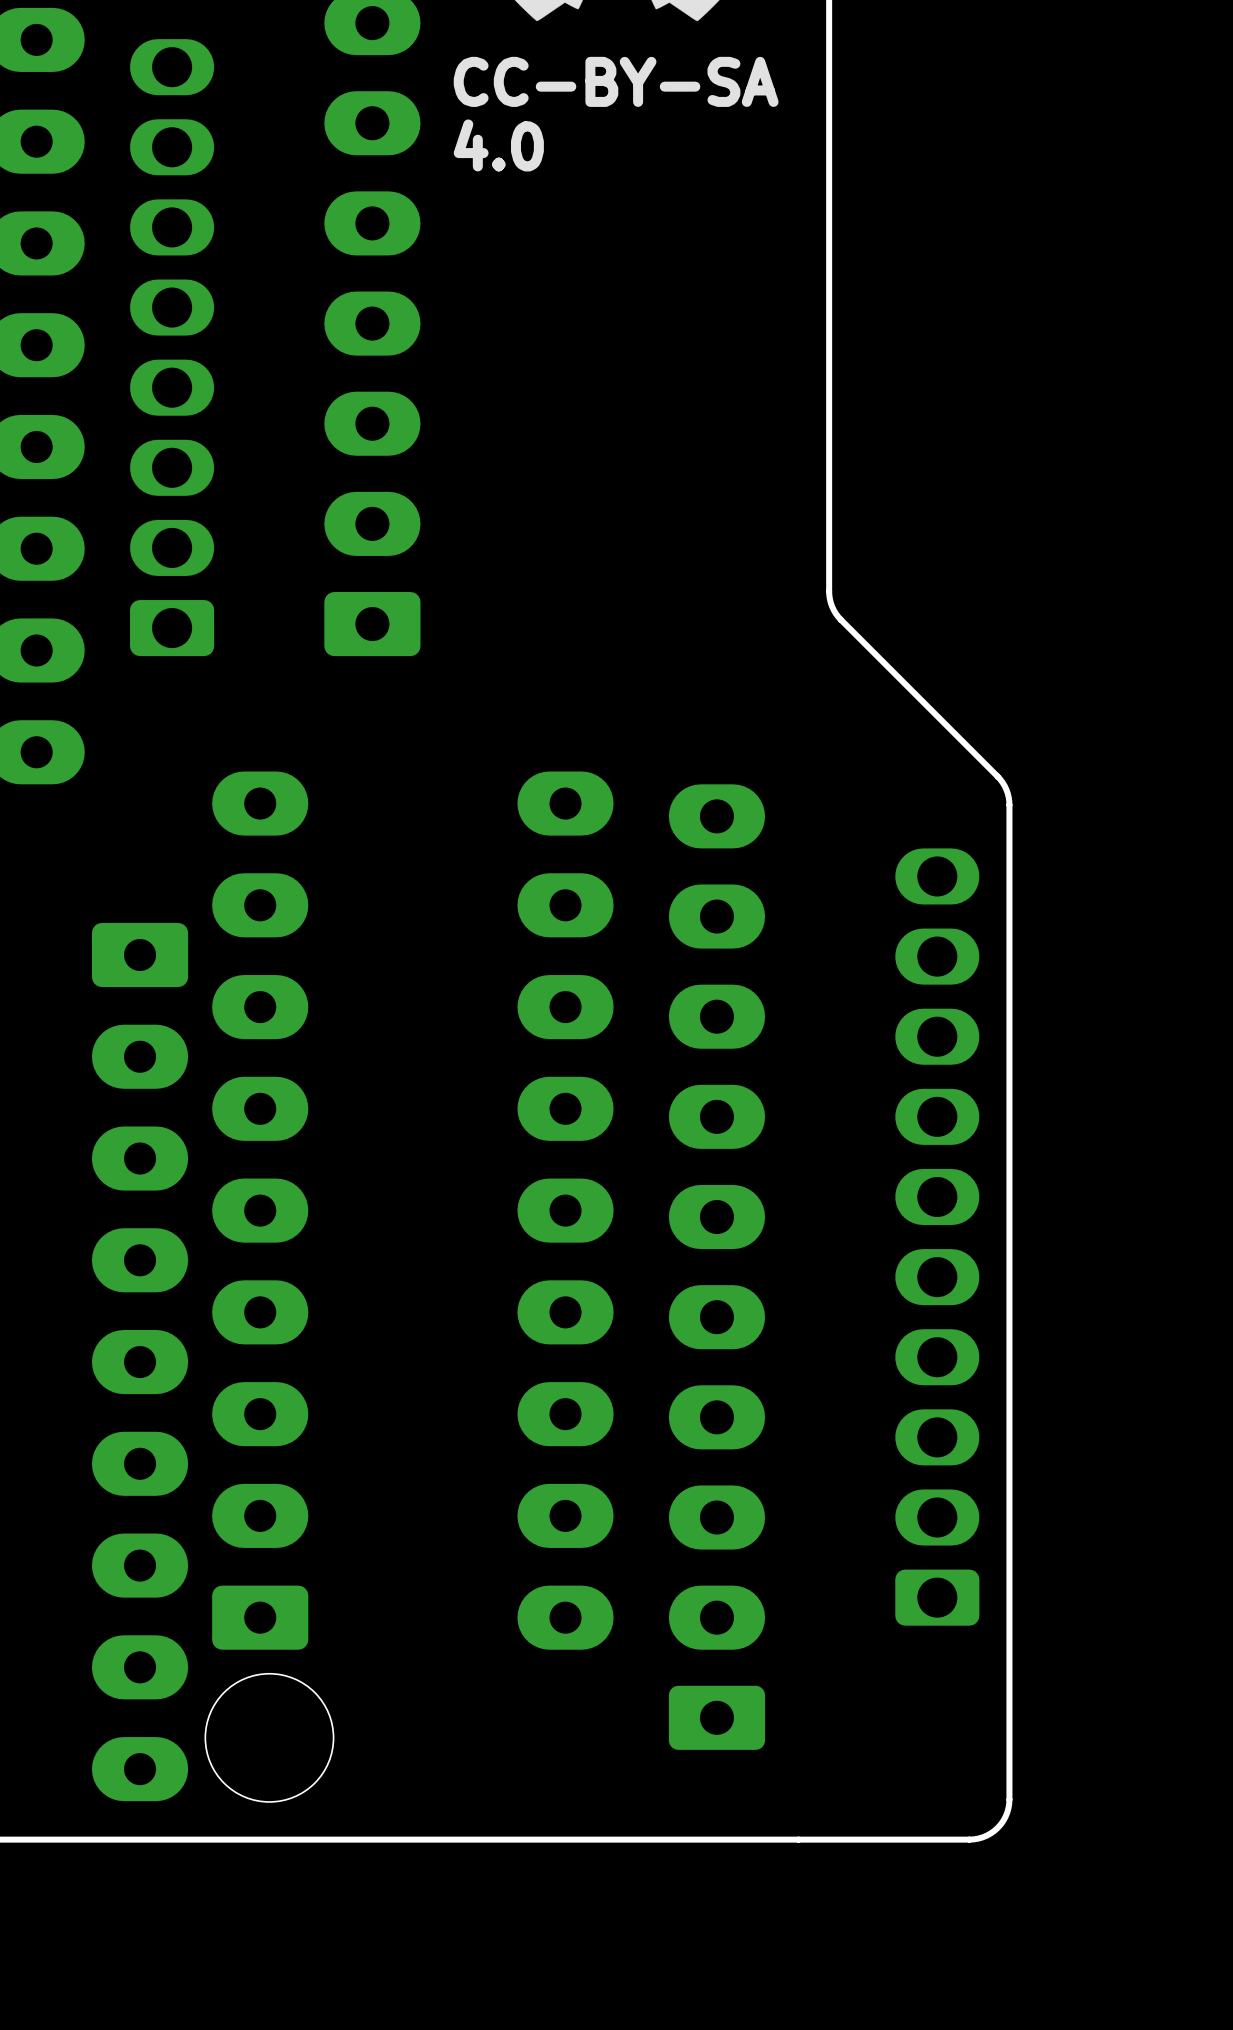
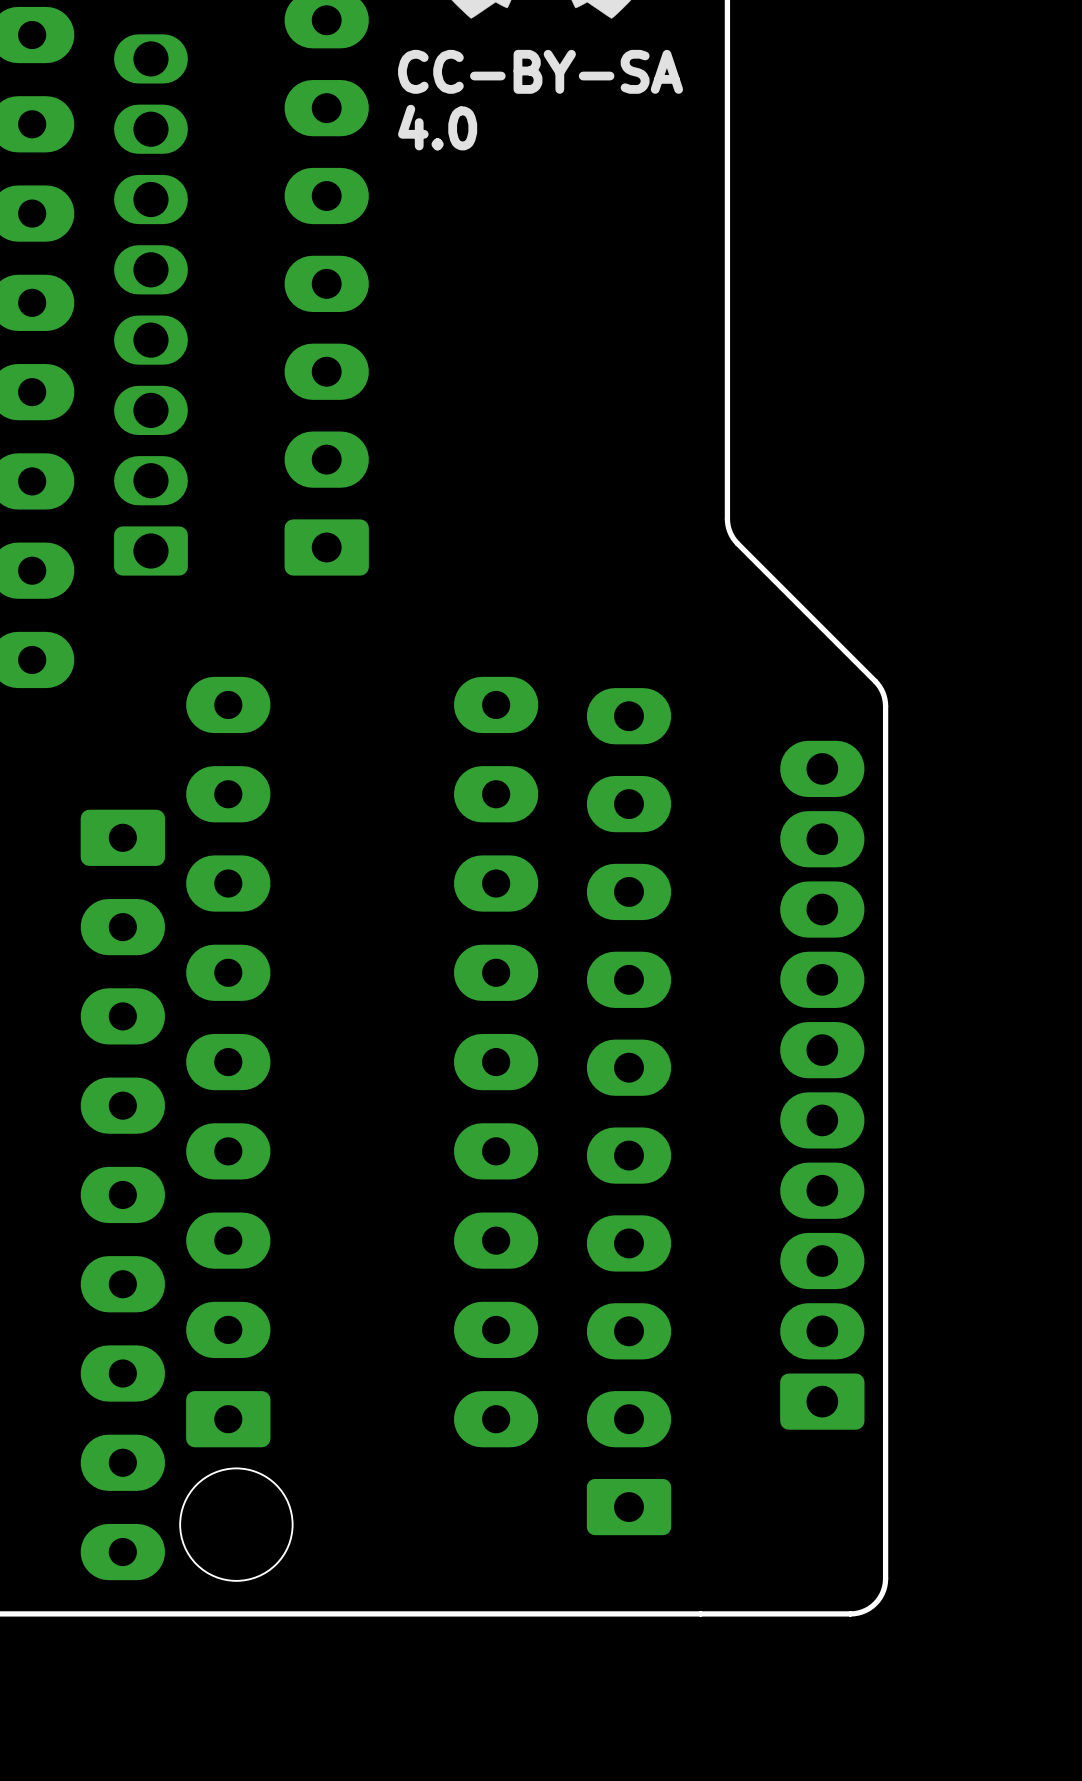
part footprint: [895, 848, 980, 1626] -> [780, 740, 865, 1430]

